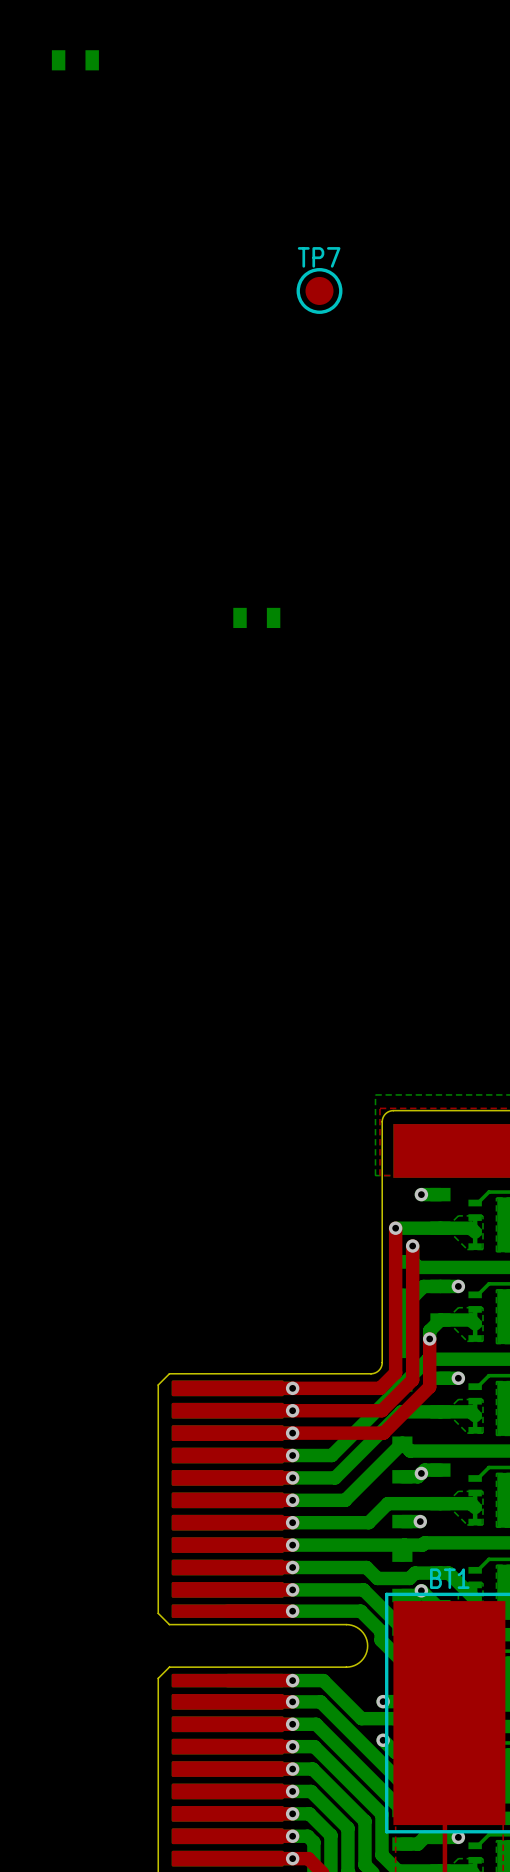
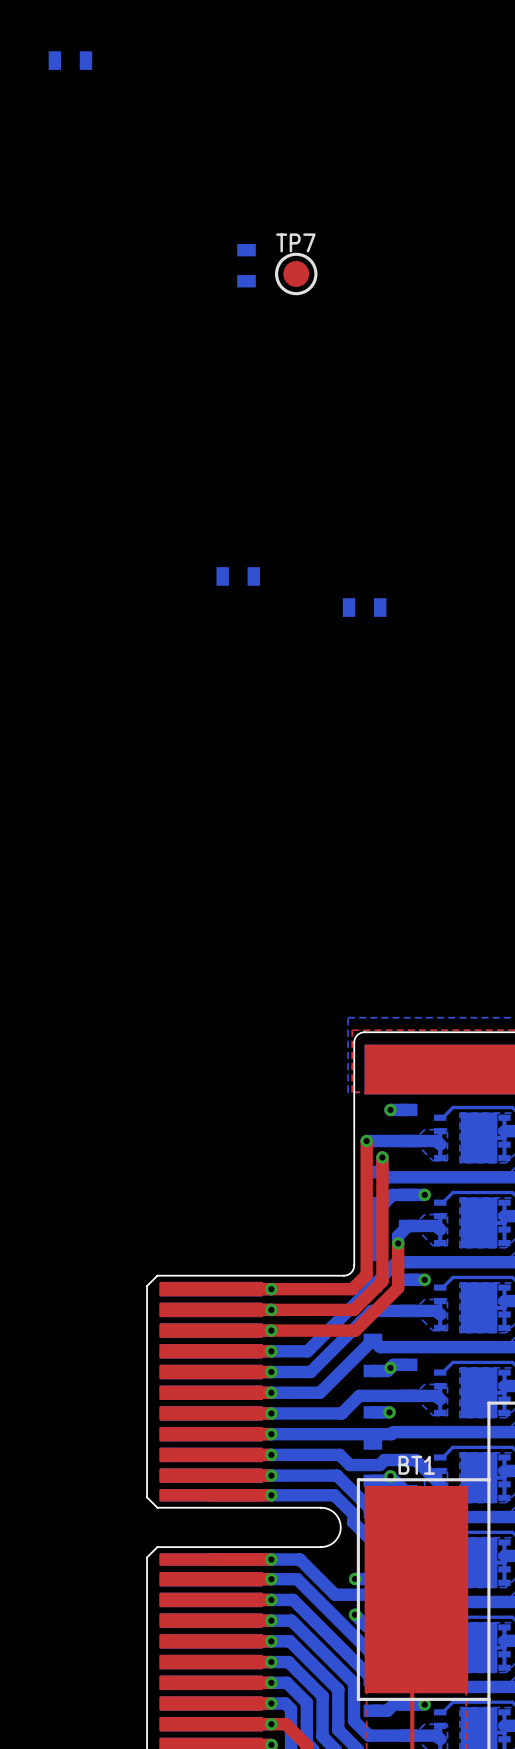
part: none -> (246, 265)
part: none -> (364, 607)

